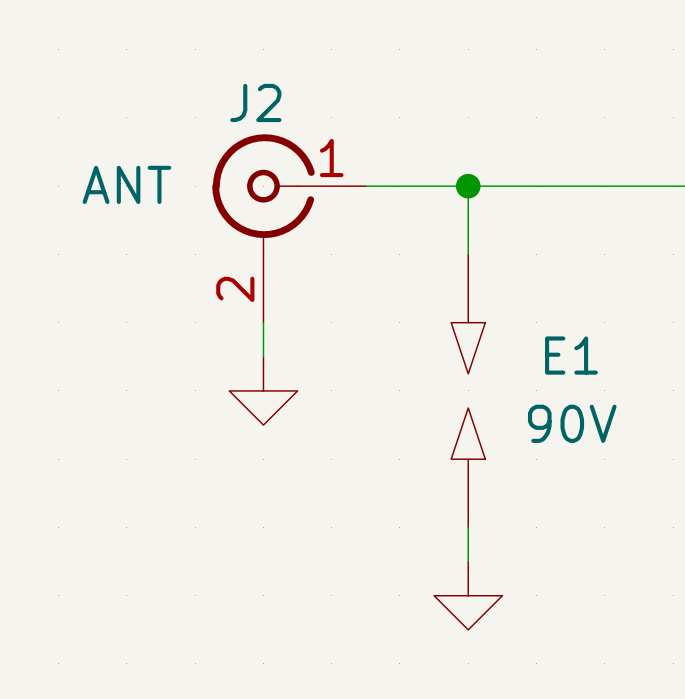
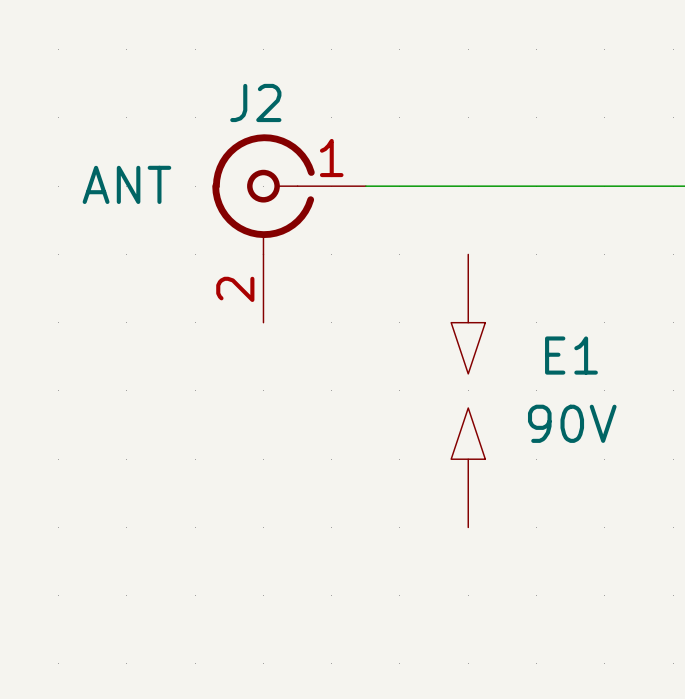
wire: (468, 186) (468, 254) -> none
junction: (468, 186) -> none
wire: (263, 322) (263, 356) -> none
power symbol: (263, 390) -> none
wire: (468, 527) (468, 561) -> none
power symbol: (468, 595) -> none

